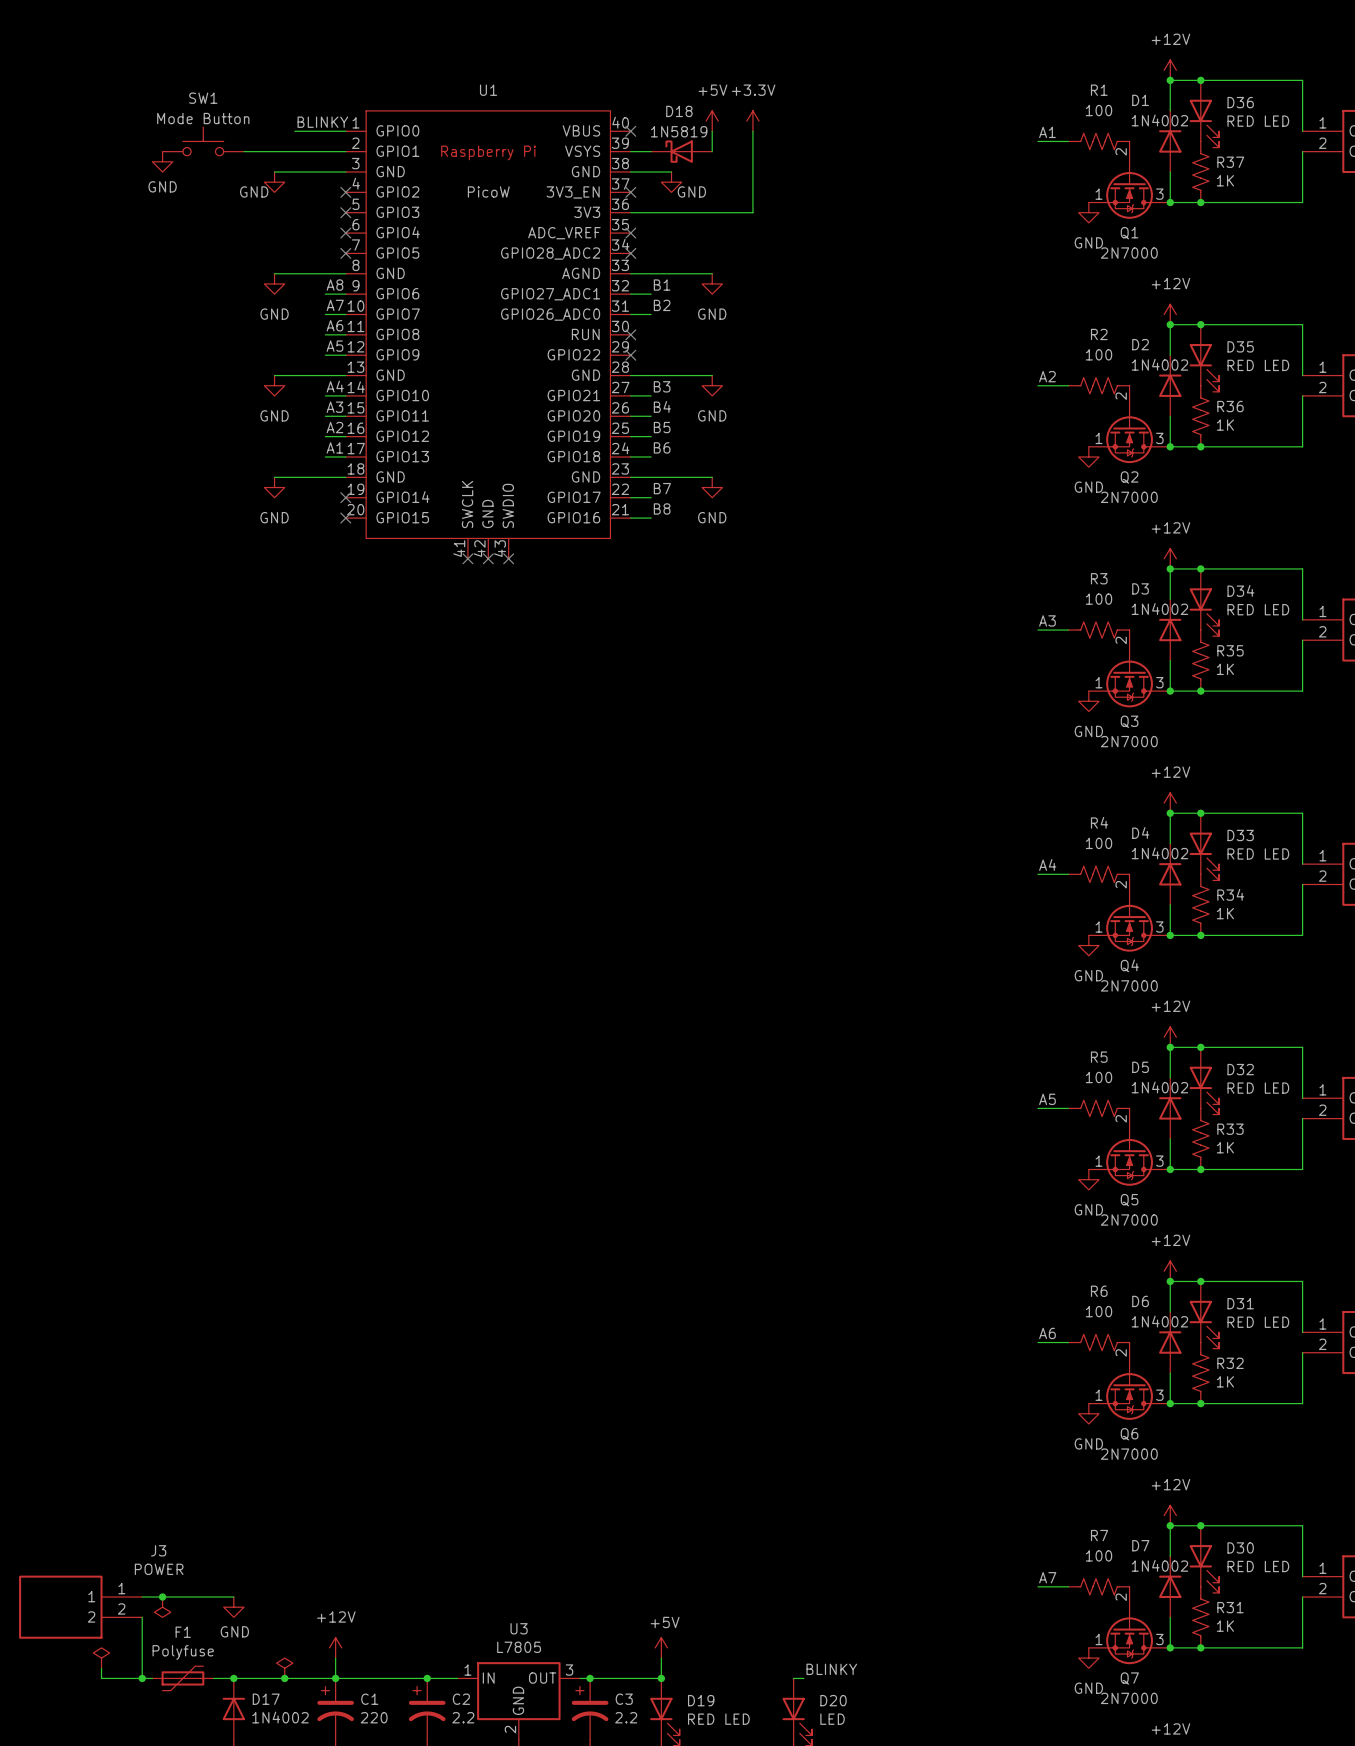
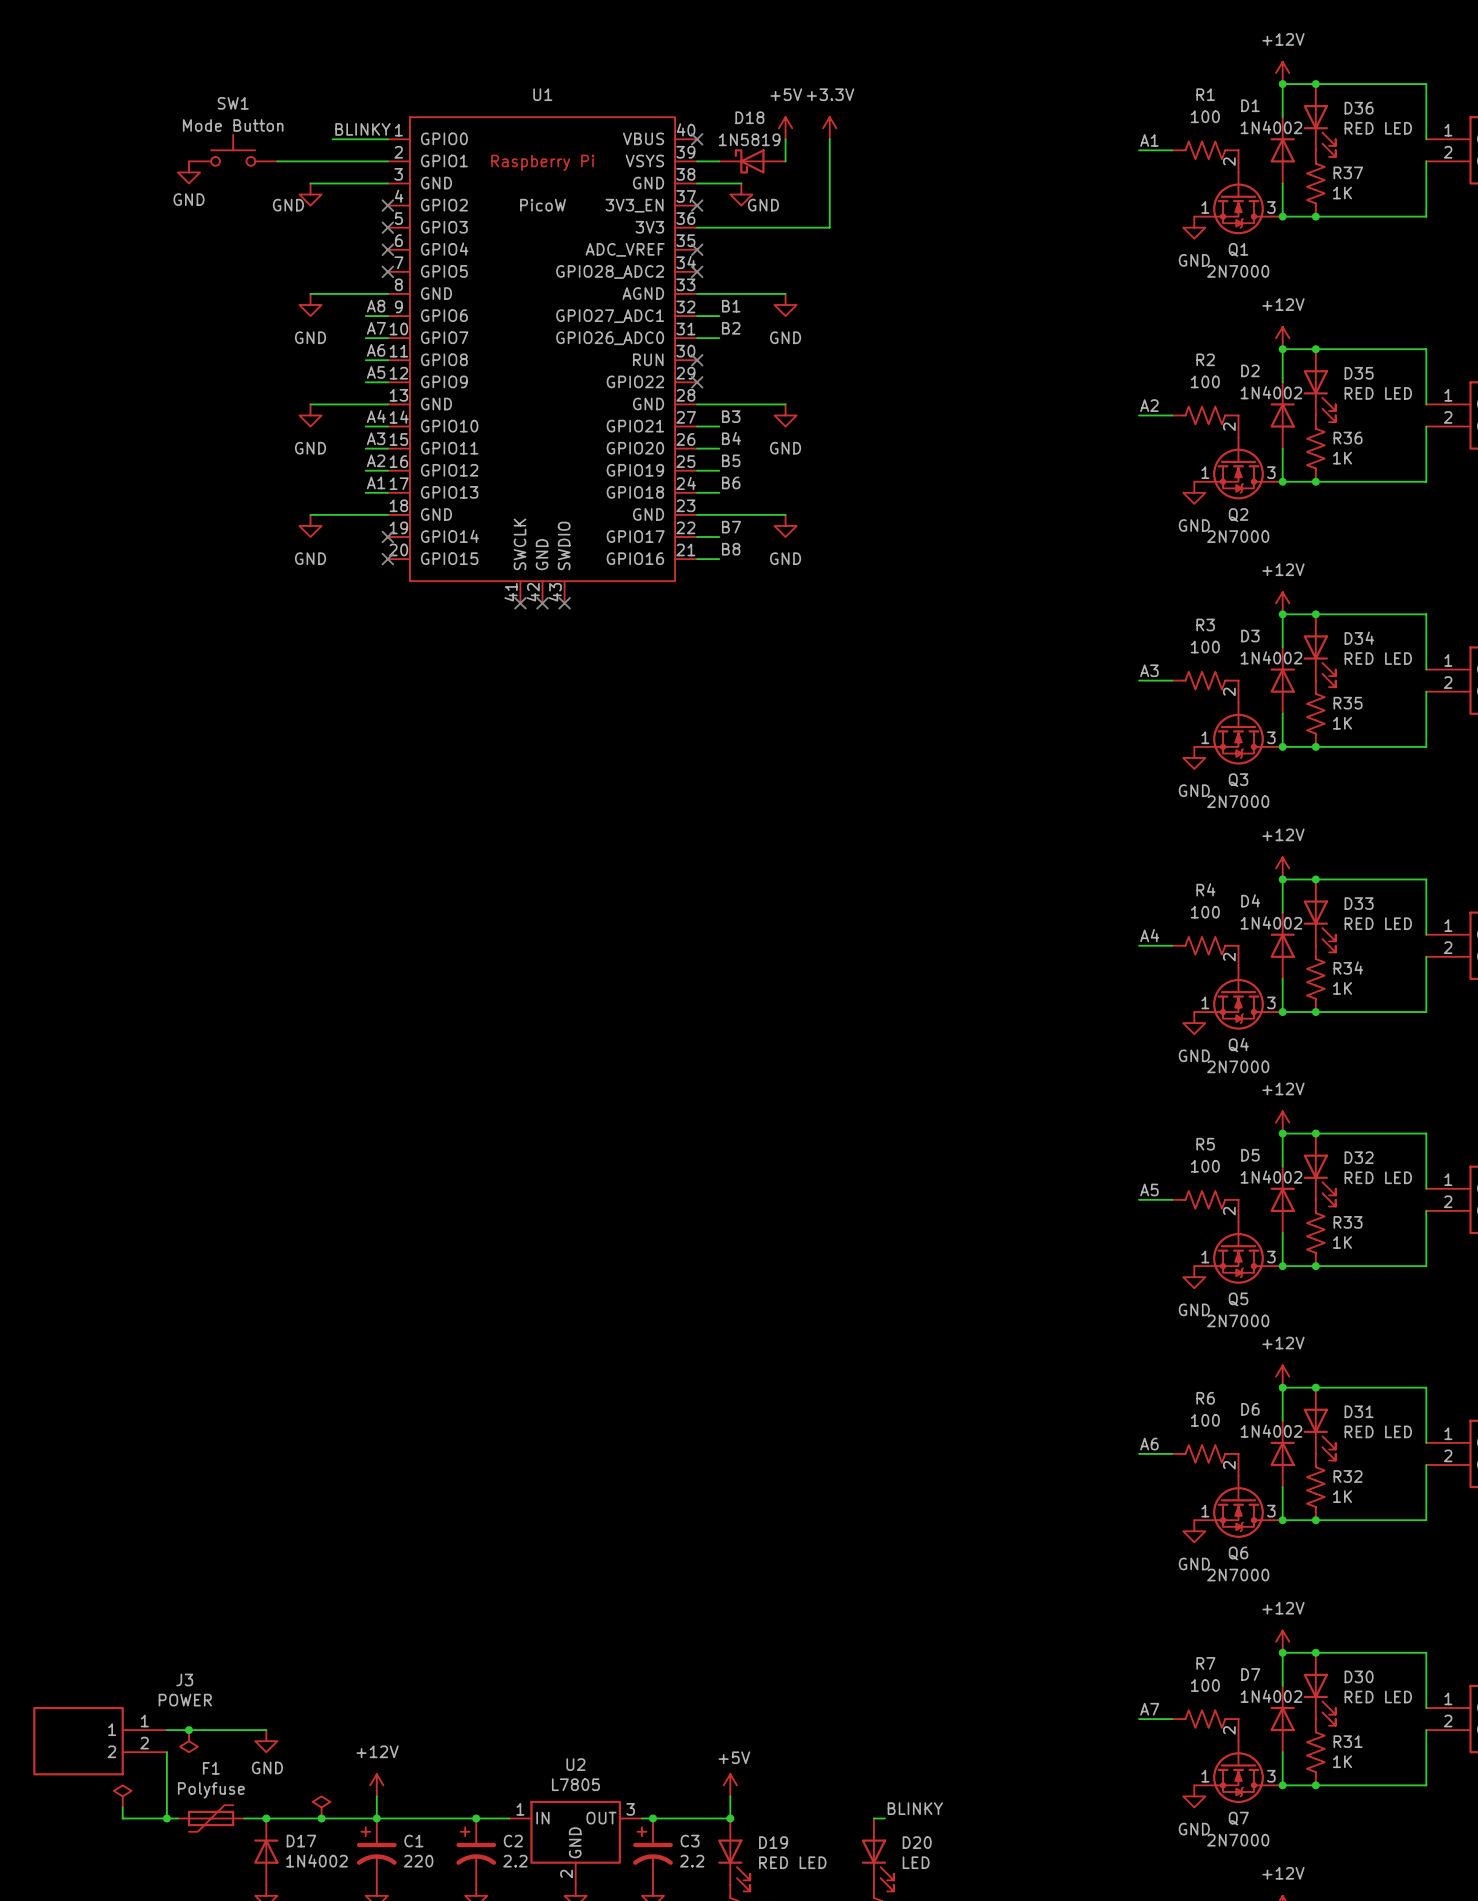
U3 name: U3 (519, 1628) -> U2 (575, 1764)

